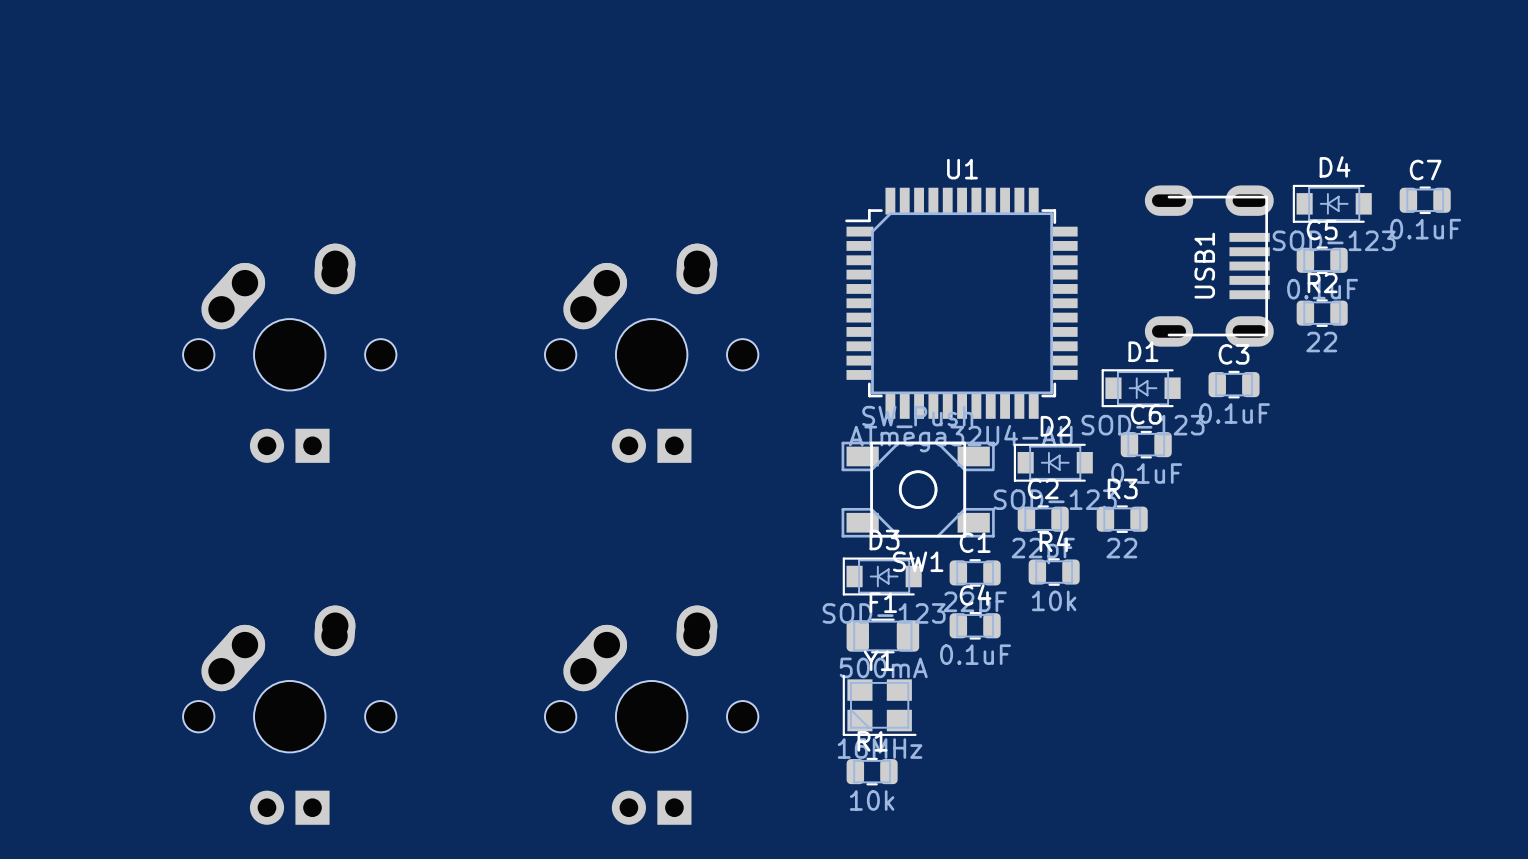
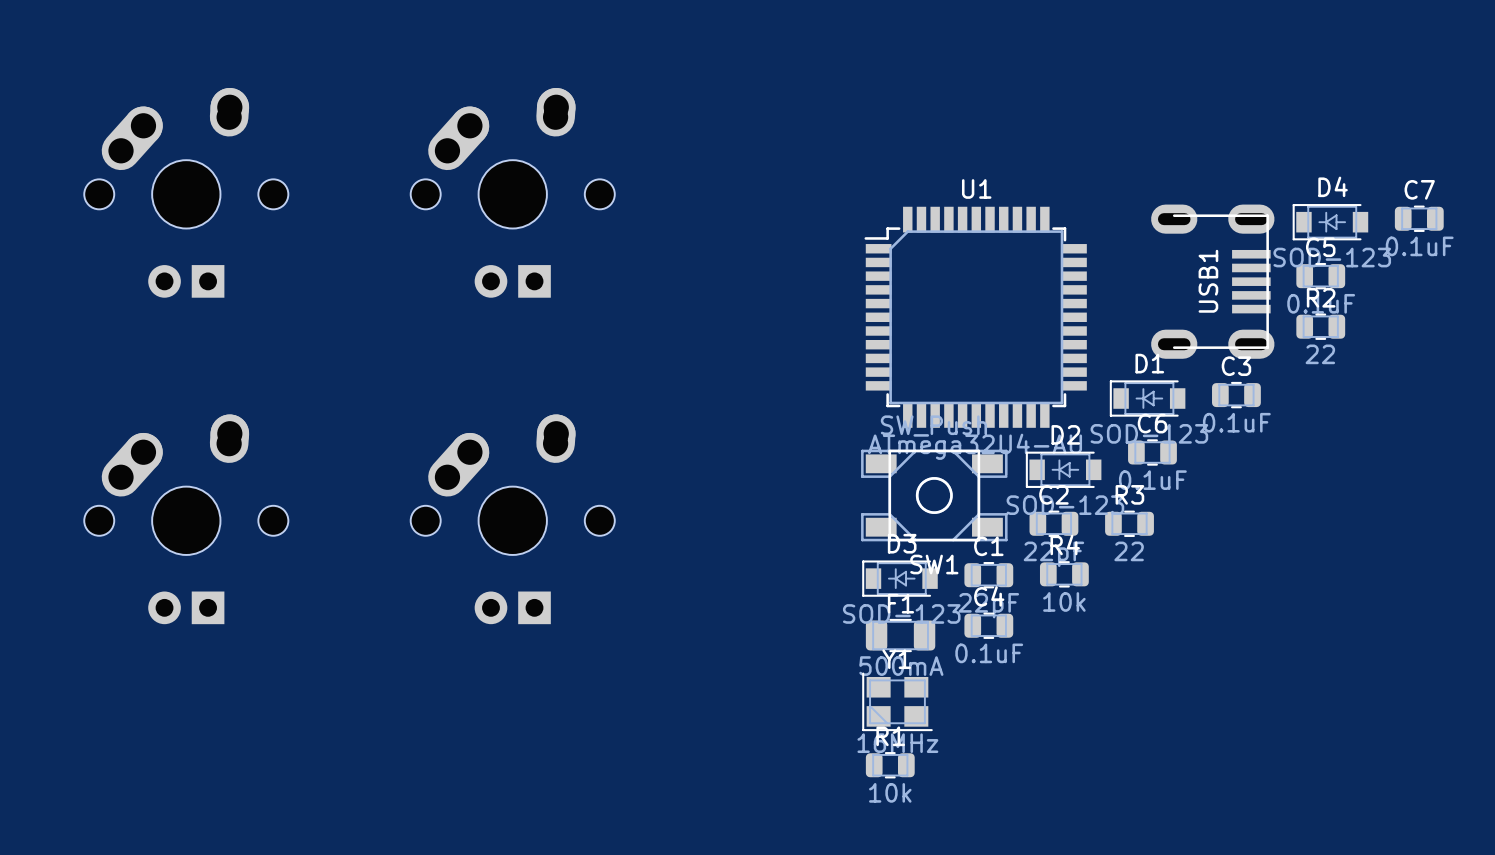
part: none -> (186, 192)
part: none -> (512, 192)
part: (289, 353) -> none
part: (651, 353) -> none
part: none -> (186, 519)
part: none -> (512, 519)
part: (289, 715) -> none
part: (651, 715) -> none

